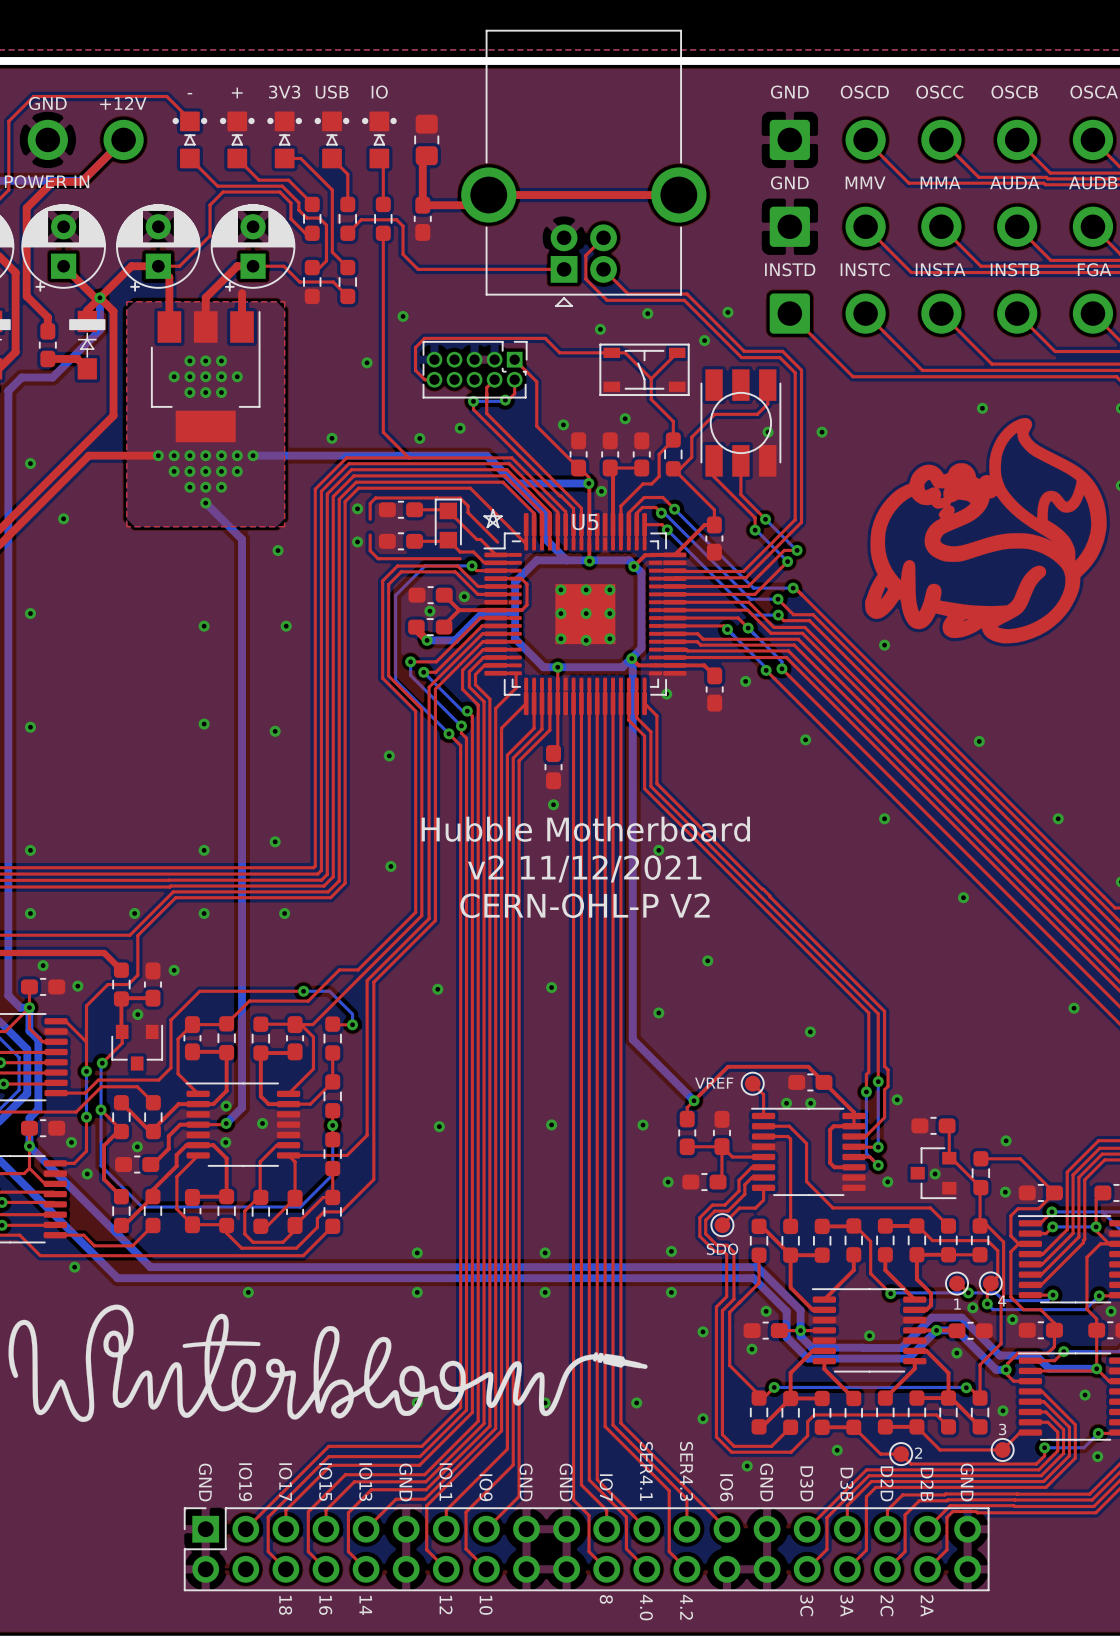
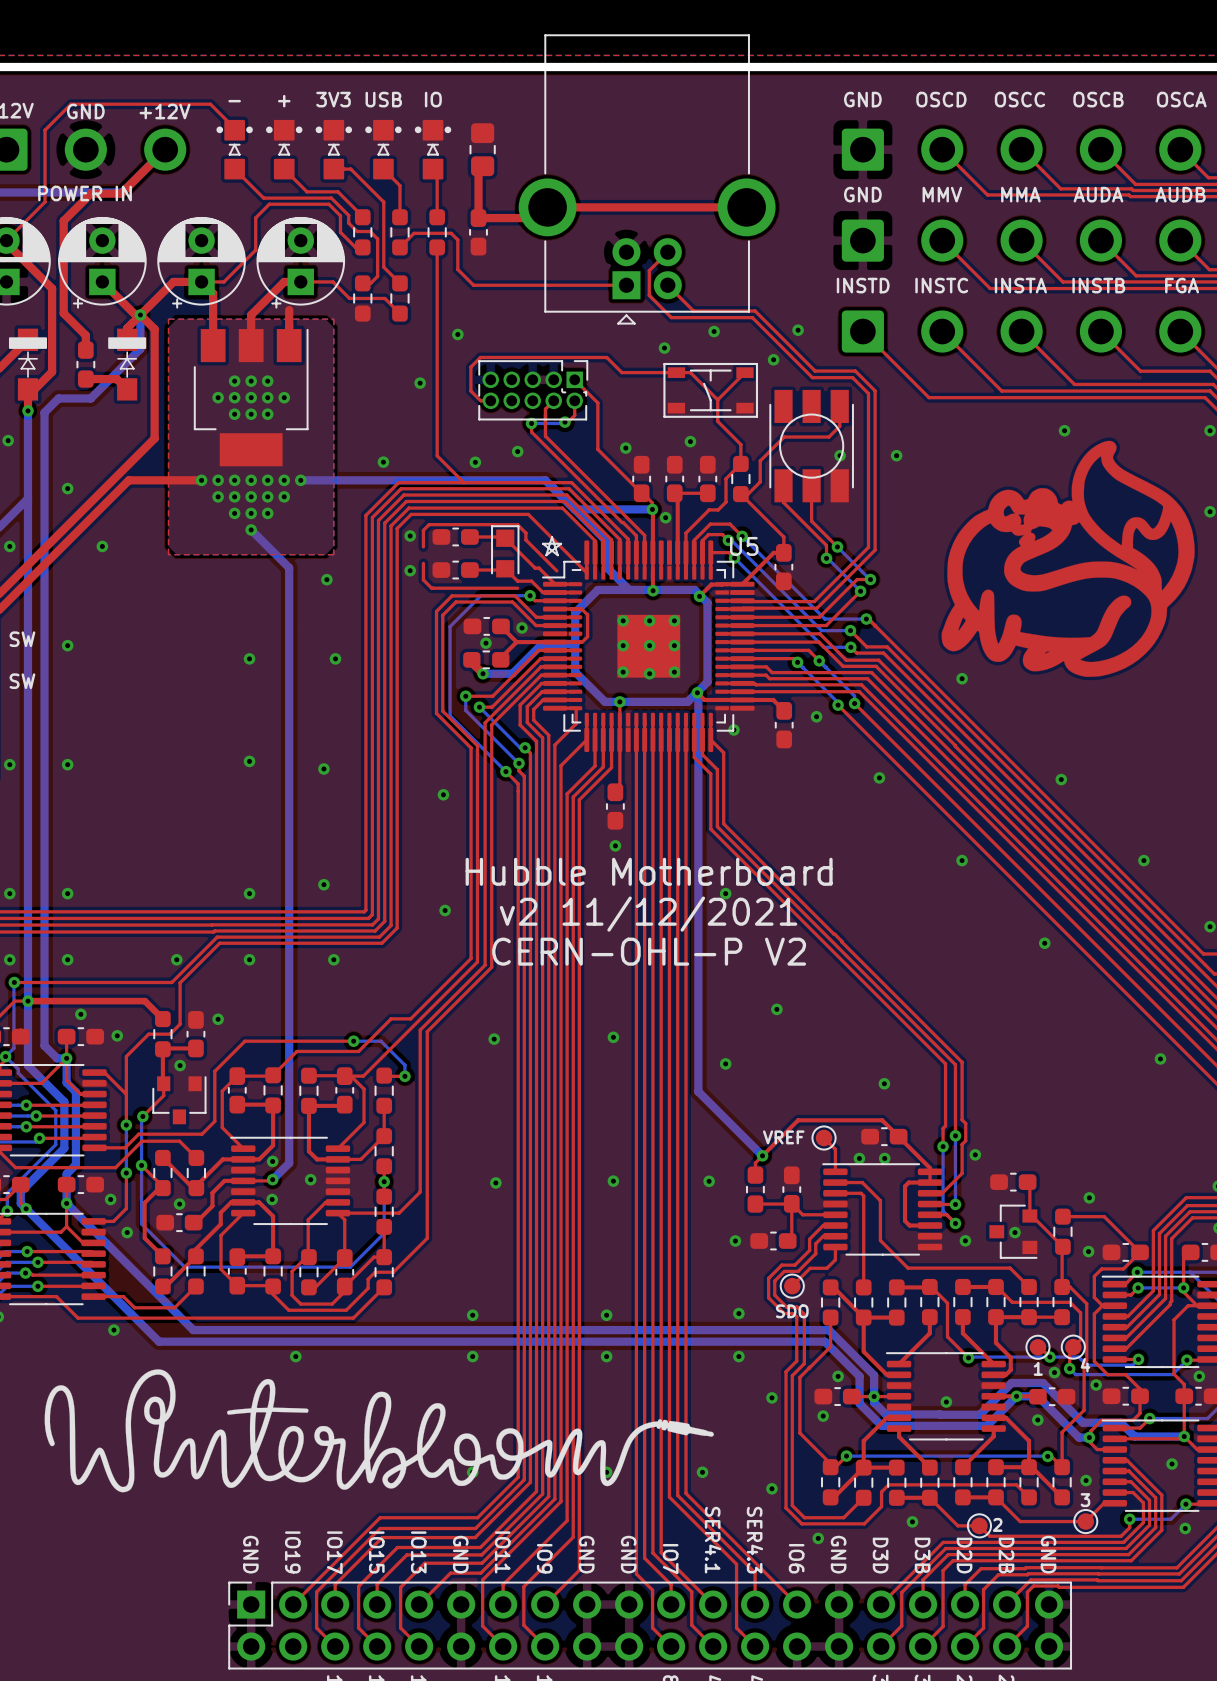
U5 name position: U5 (585, 522) -> U5 (744, 546)

